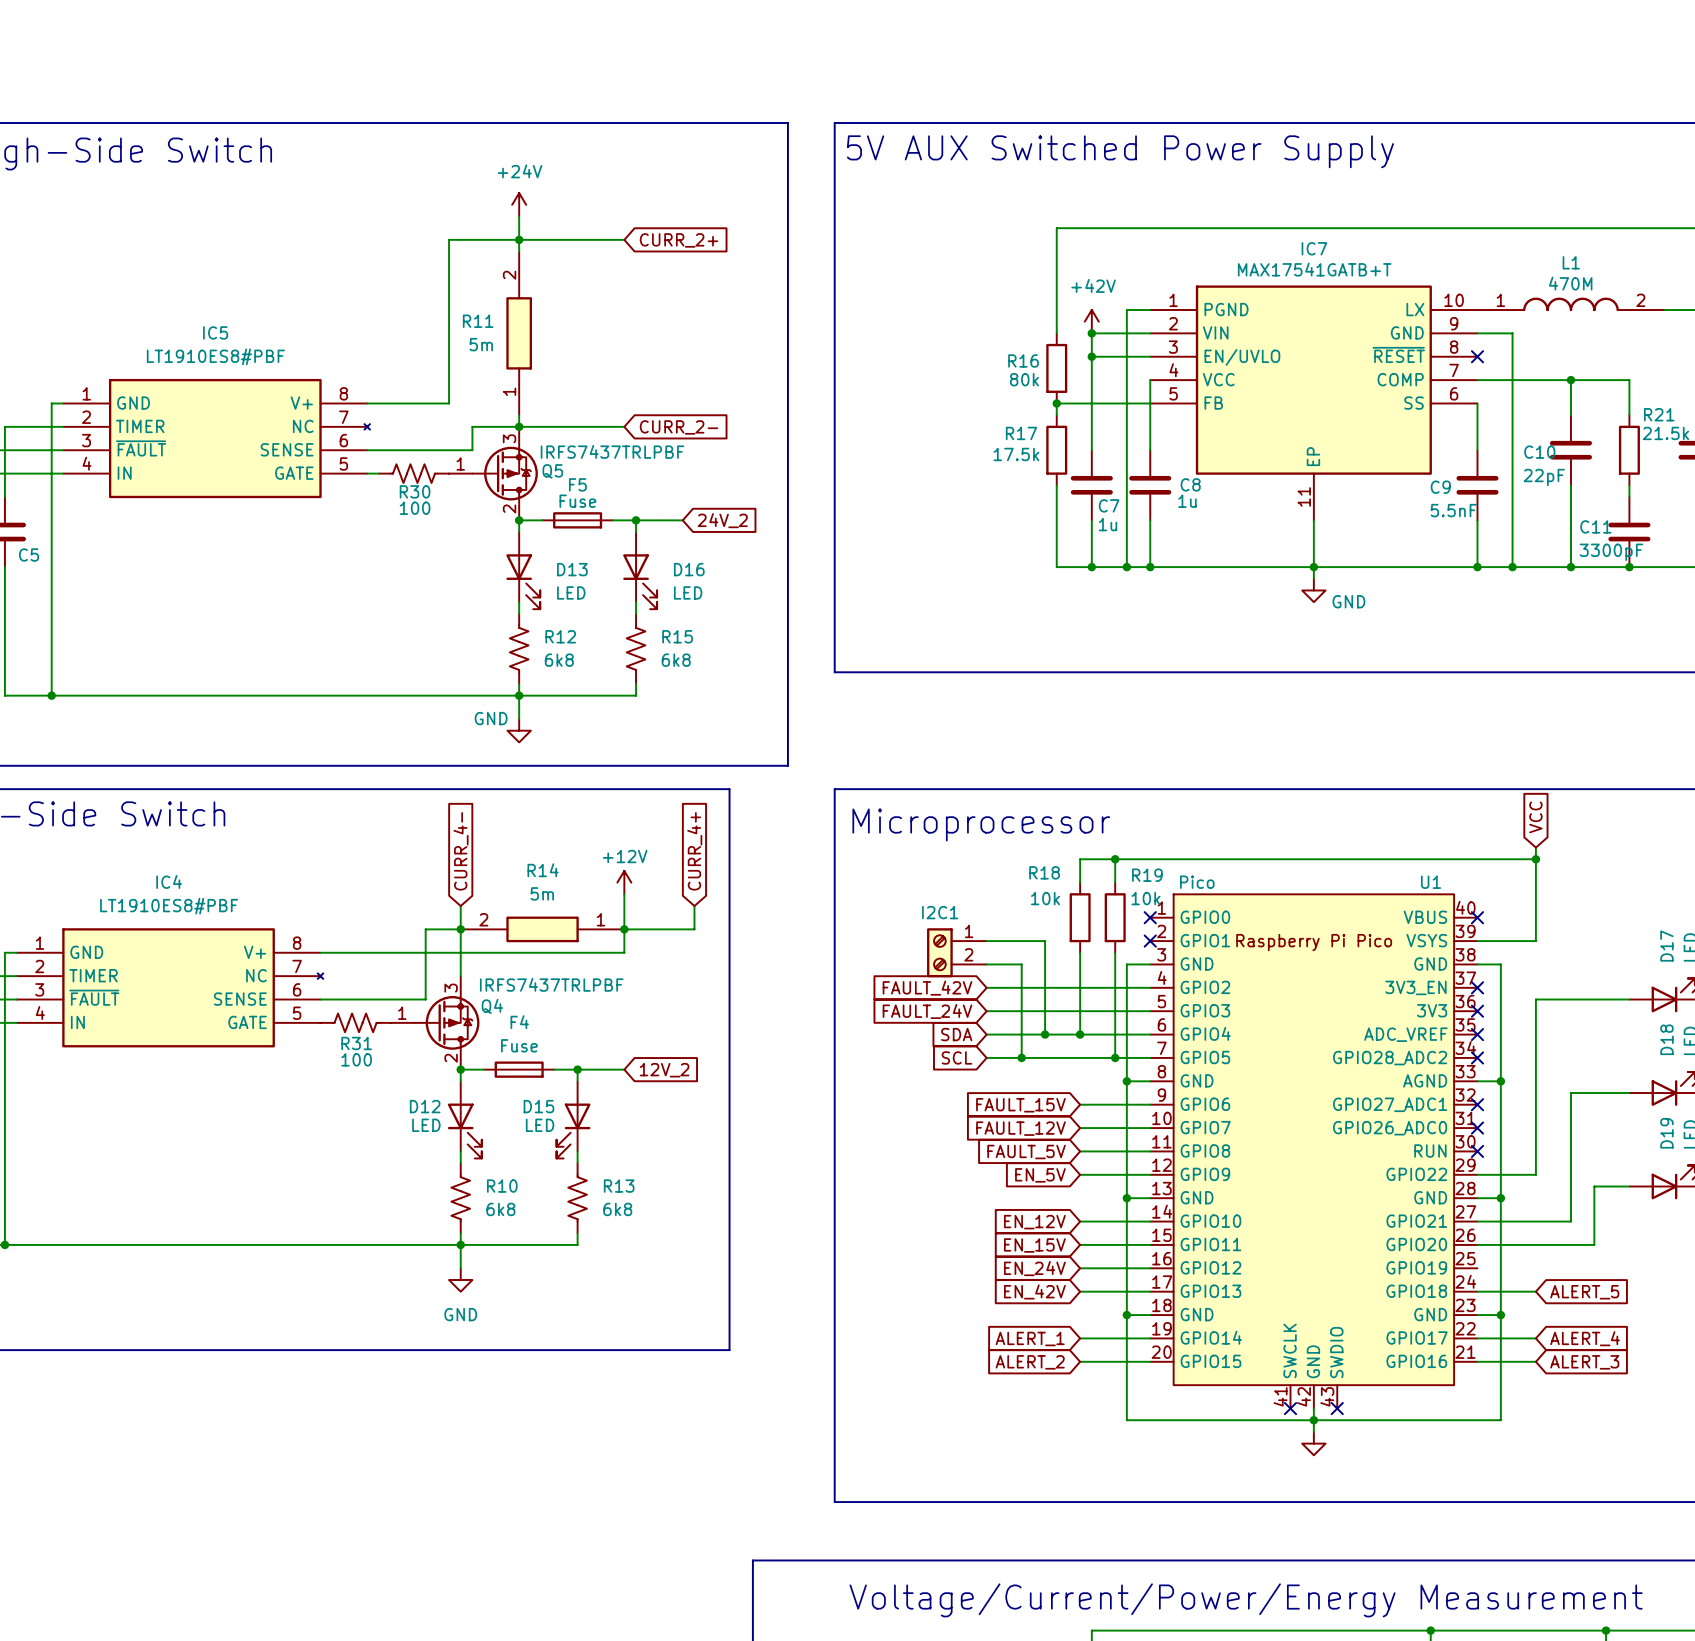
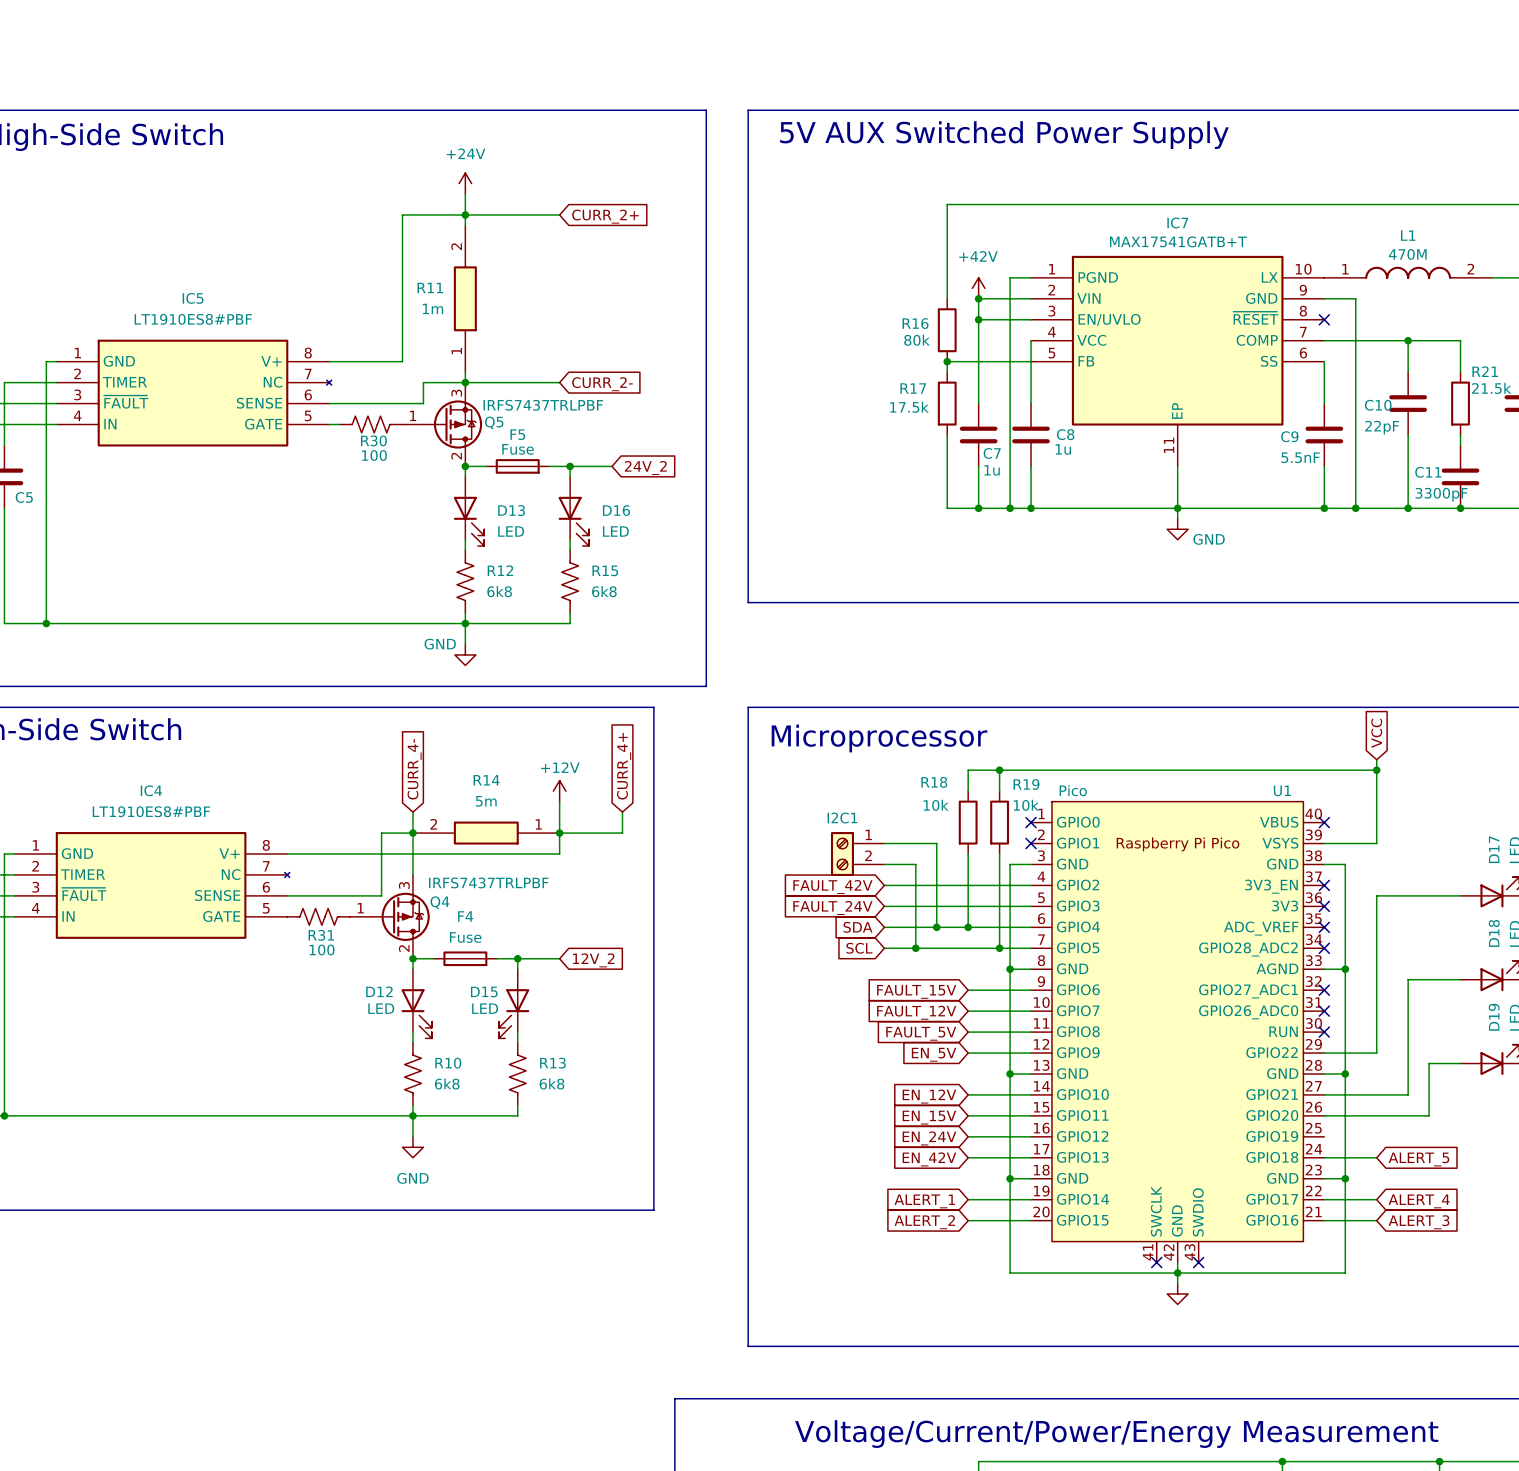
R11 value: 5m (481, 344) -> 1m (433, 308)

